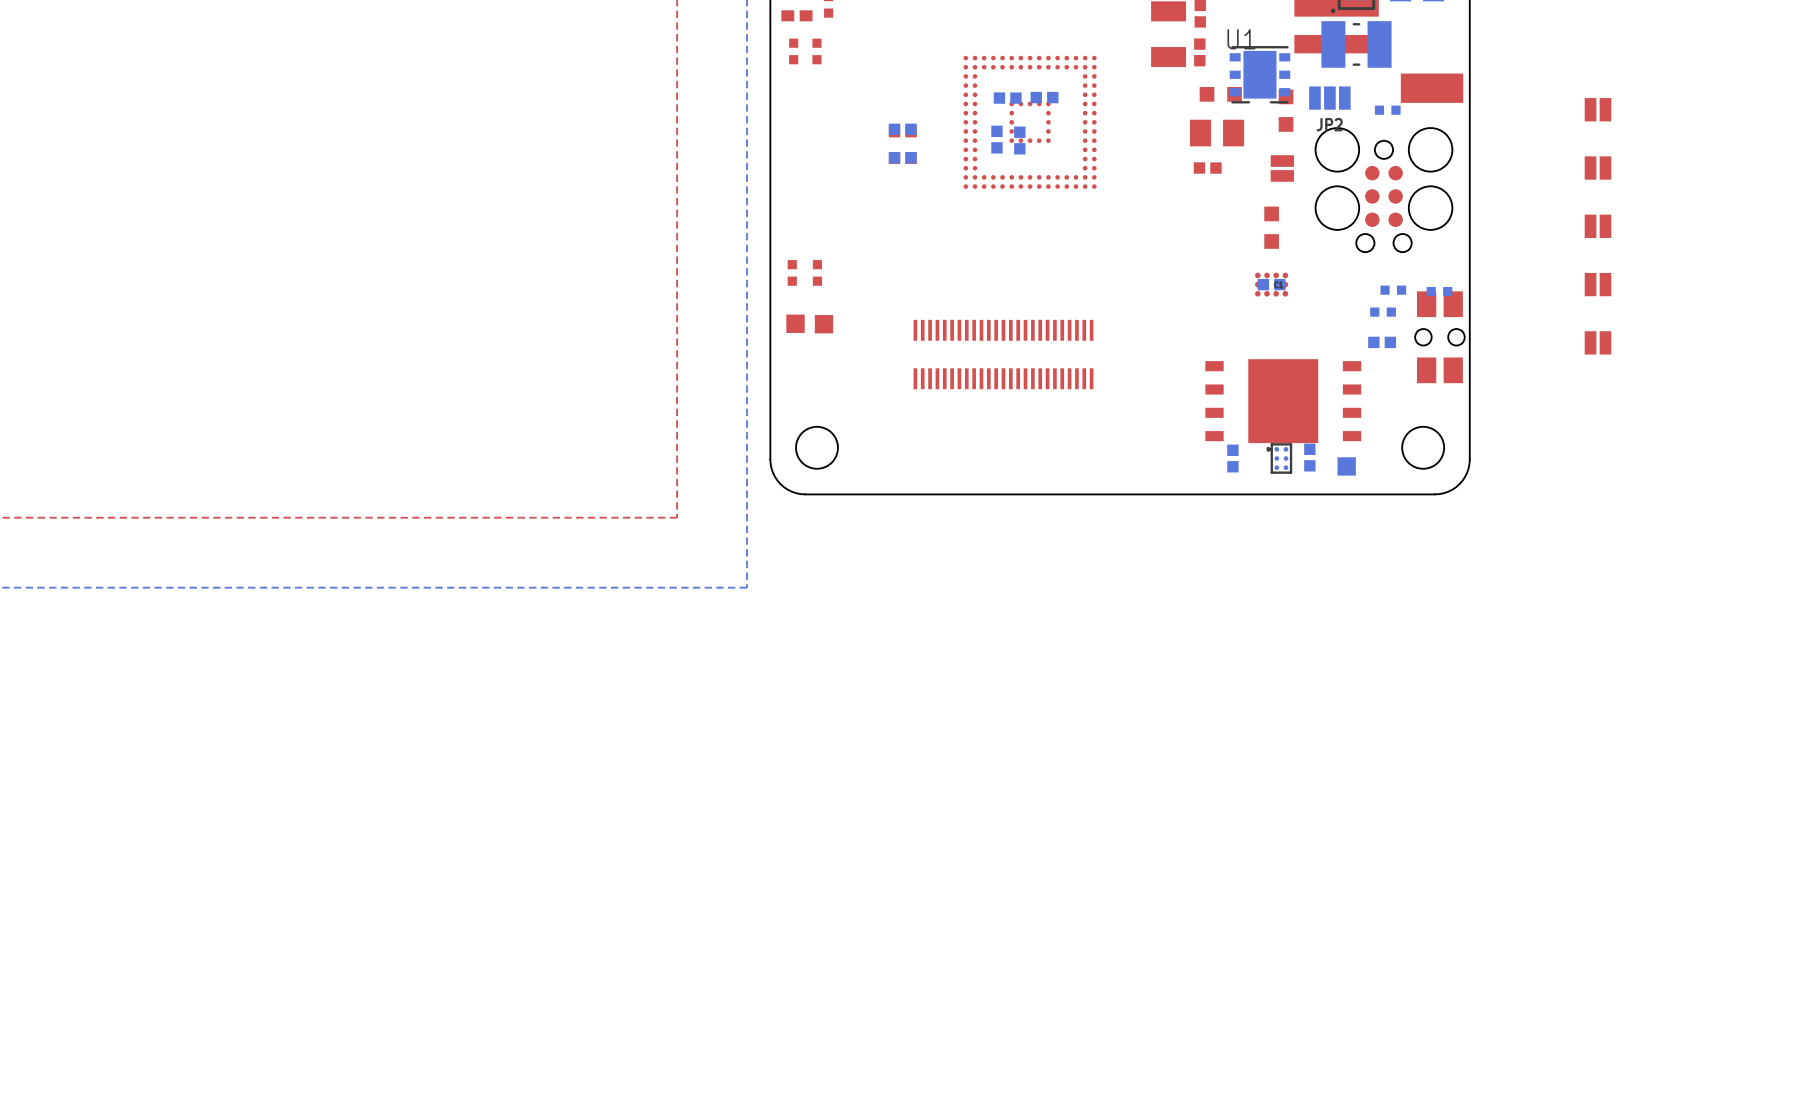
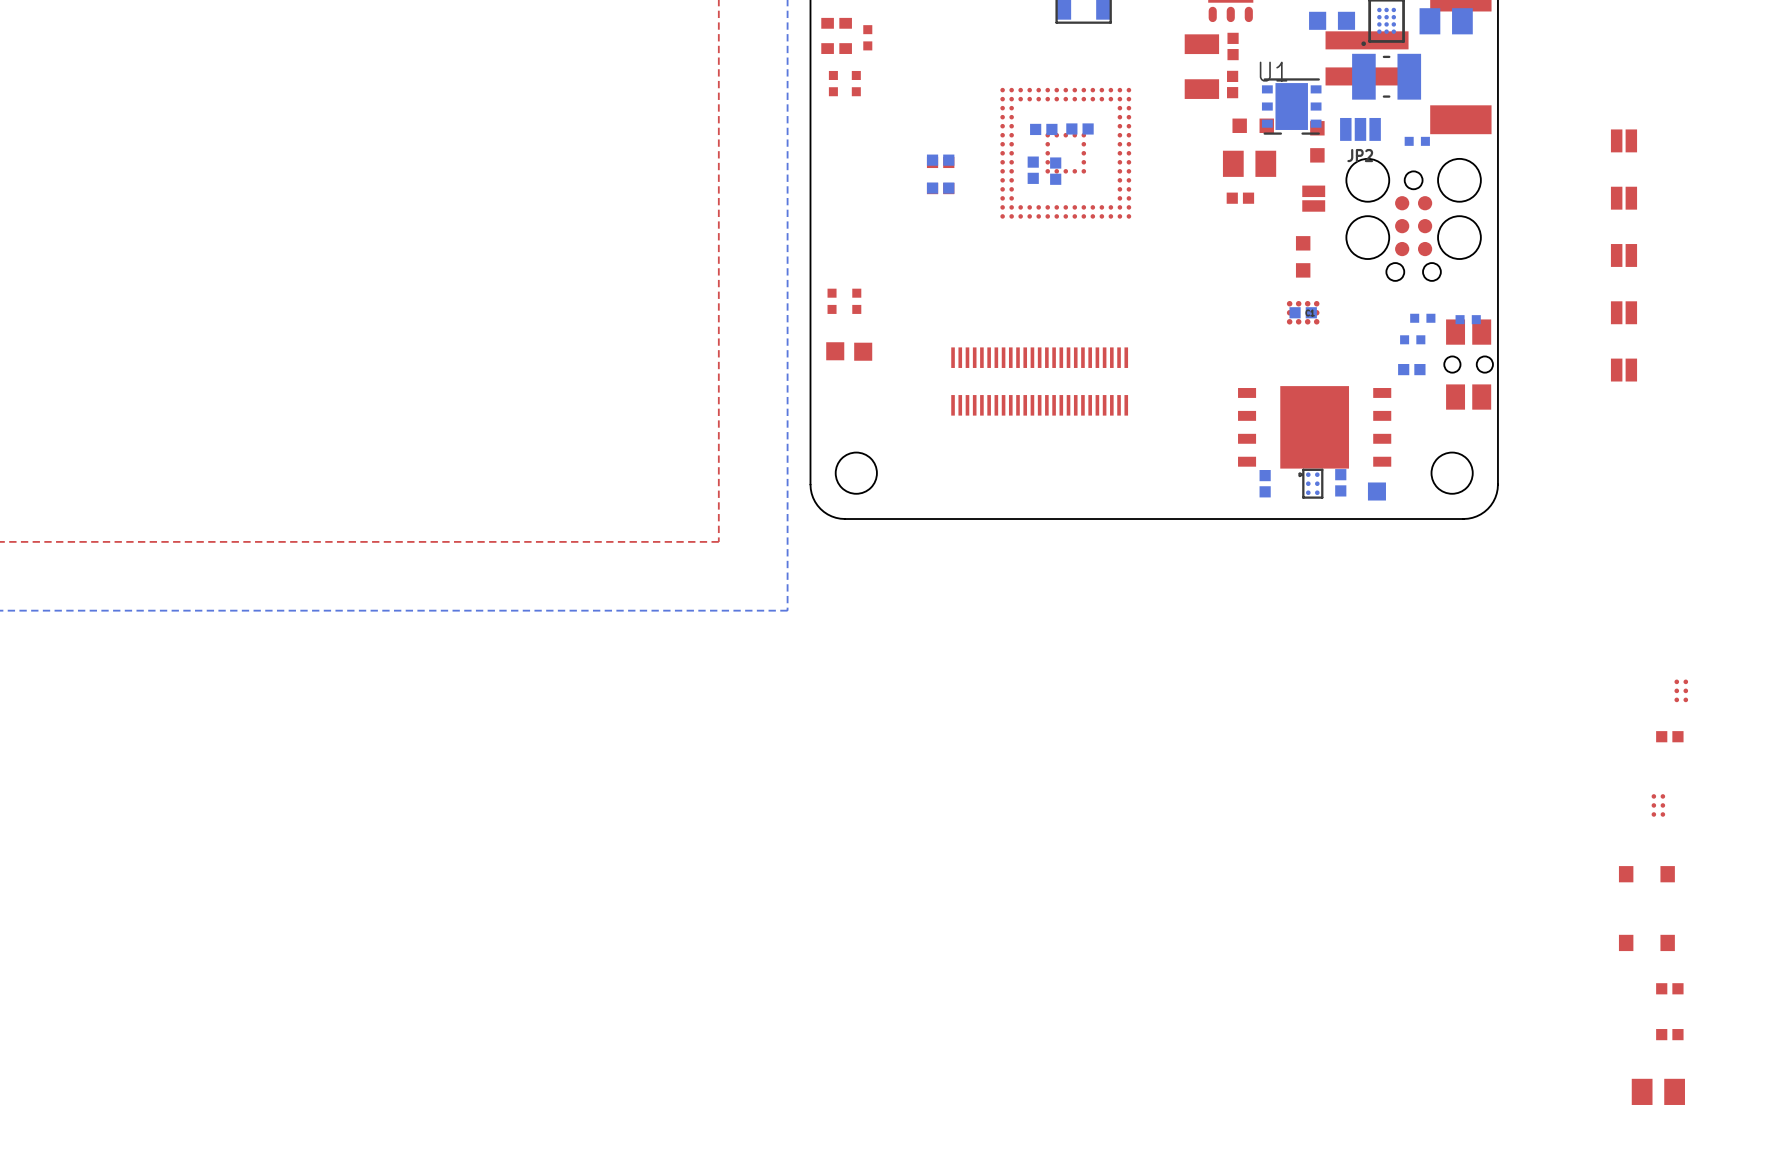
part: none -> (1681, 690)
part: none -> (1669, 736)
part: none -> (1658, 805)
part: none -> (1646, 874)
part: none -> (1646, 942)
part: none -> (1669, 988)
part: none -> (1669, 1034)
part: none -> (1658, 1091)

